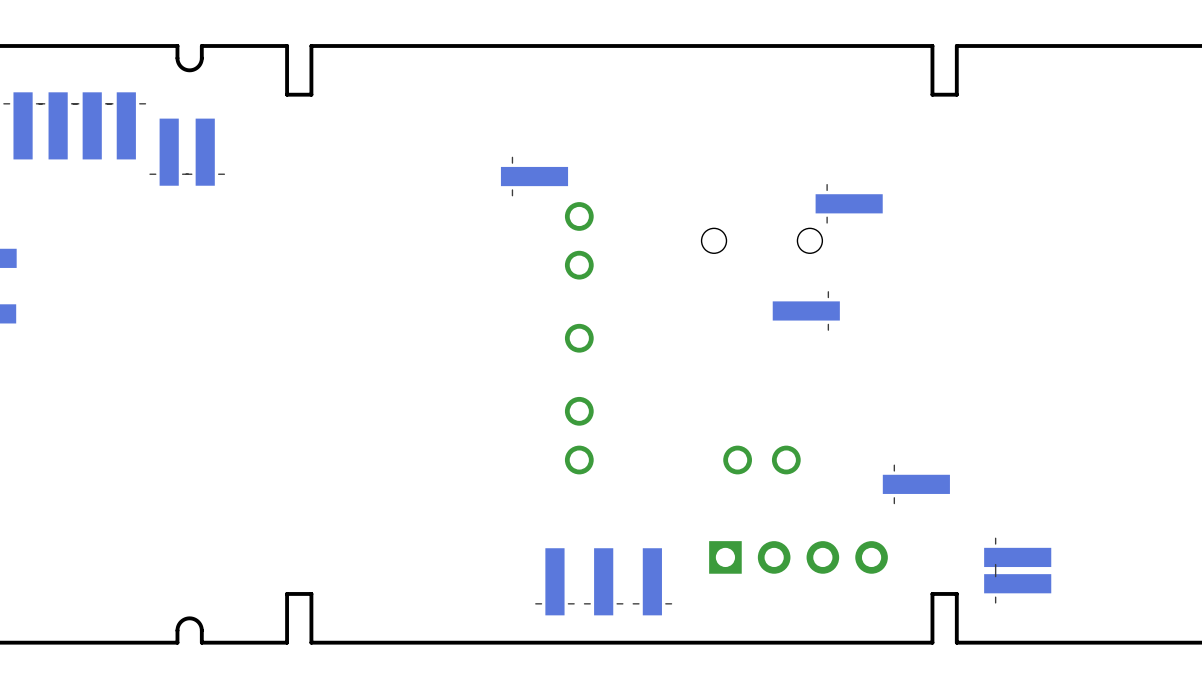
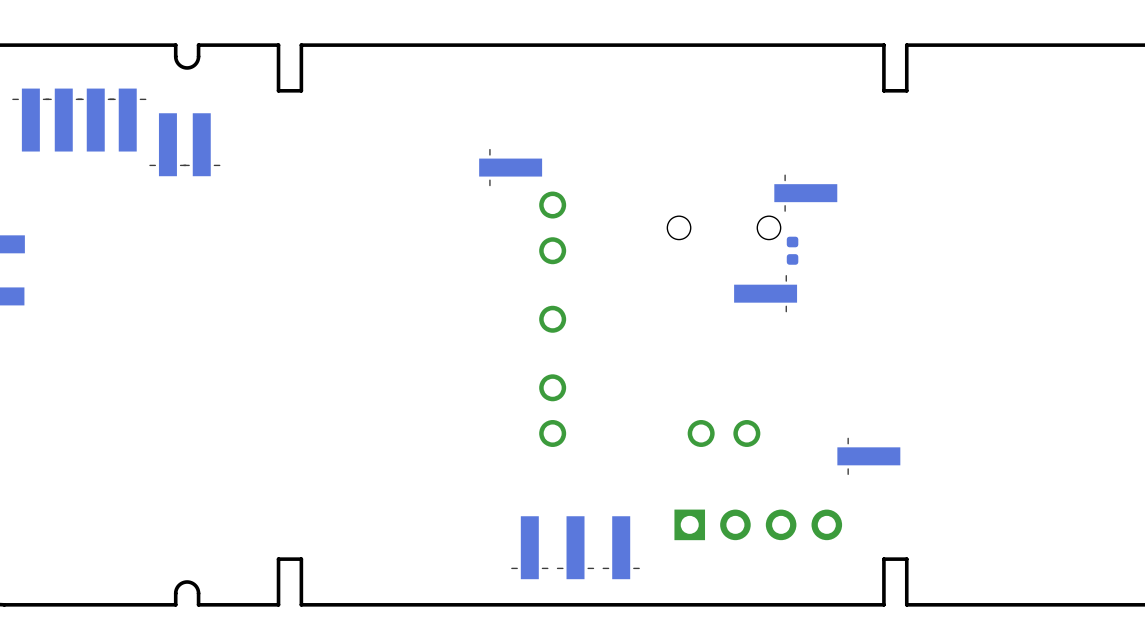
part: none -> (792, 250)
part: (1017, 557) -> none
part: (1017, 583) -> none

